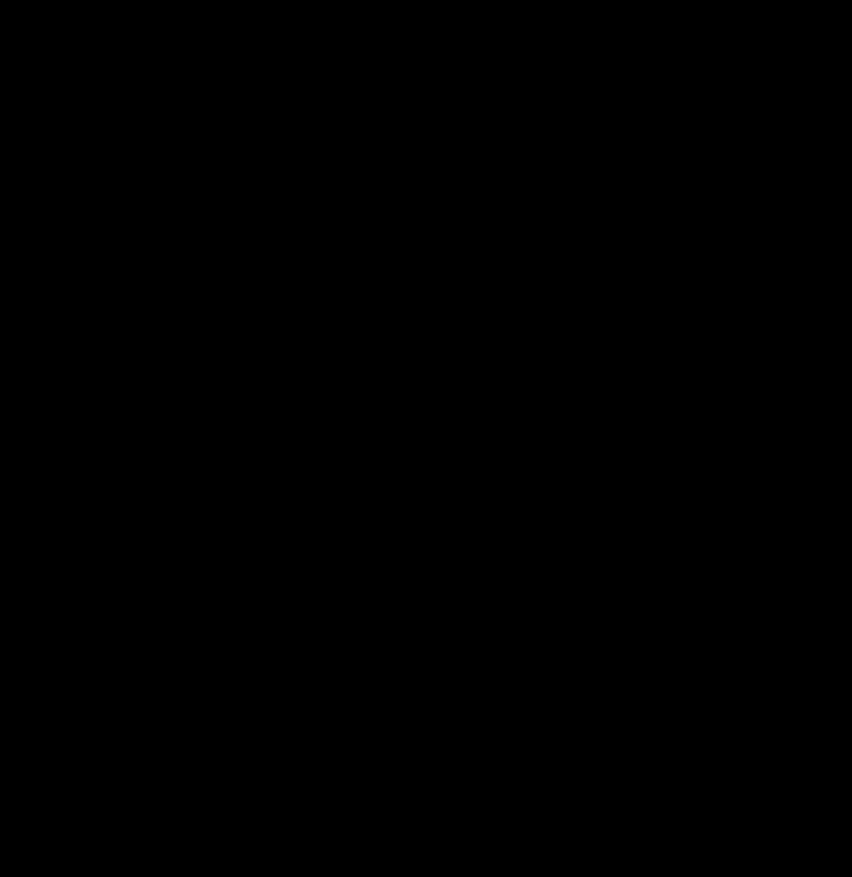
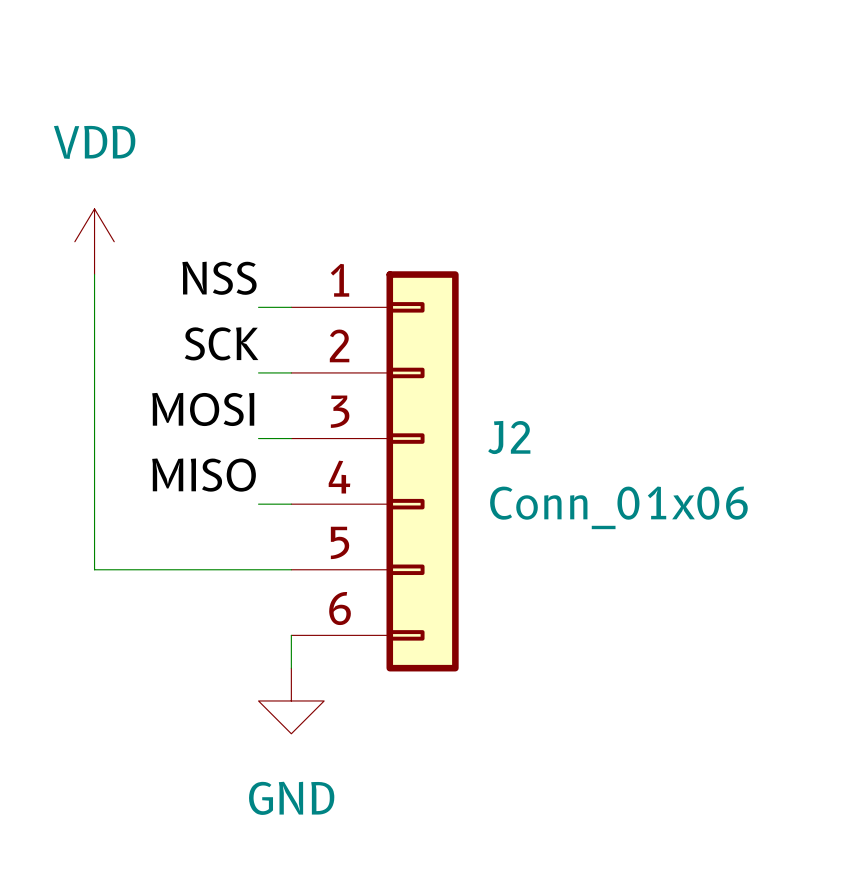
power symbol: none -> VDD (94, 241)
wire: none -> (94, 274) (94, 569) (291, 569)
label: none -> NSS (219, 278)
wire: none -> (258, 307) (291, 307)
label: none -> SCK (221, 343)
wire: none -> (258, 372) (291, 372)
label: none -> MOSI (203, 409)
wire: none -> (258, 438) (291, 438)
J2: none -> Conn_01x06 (375, 471)
label: none -> MISO (204, 475)
wire: none -> (258, 504) (291, 504)
wire: none -> (291, 635) (291, 668)
power symbol: none -> GND (291, 700)

